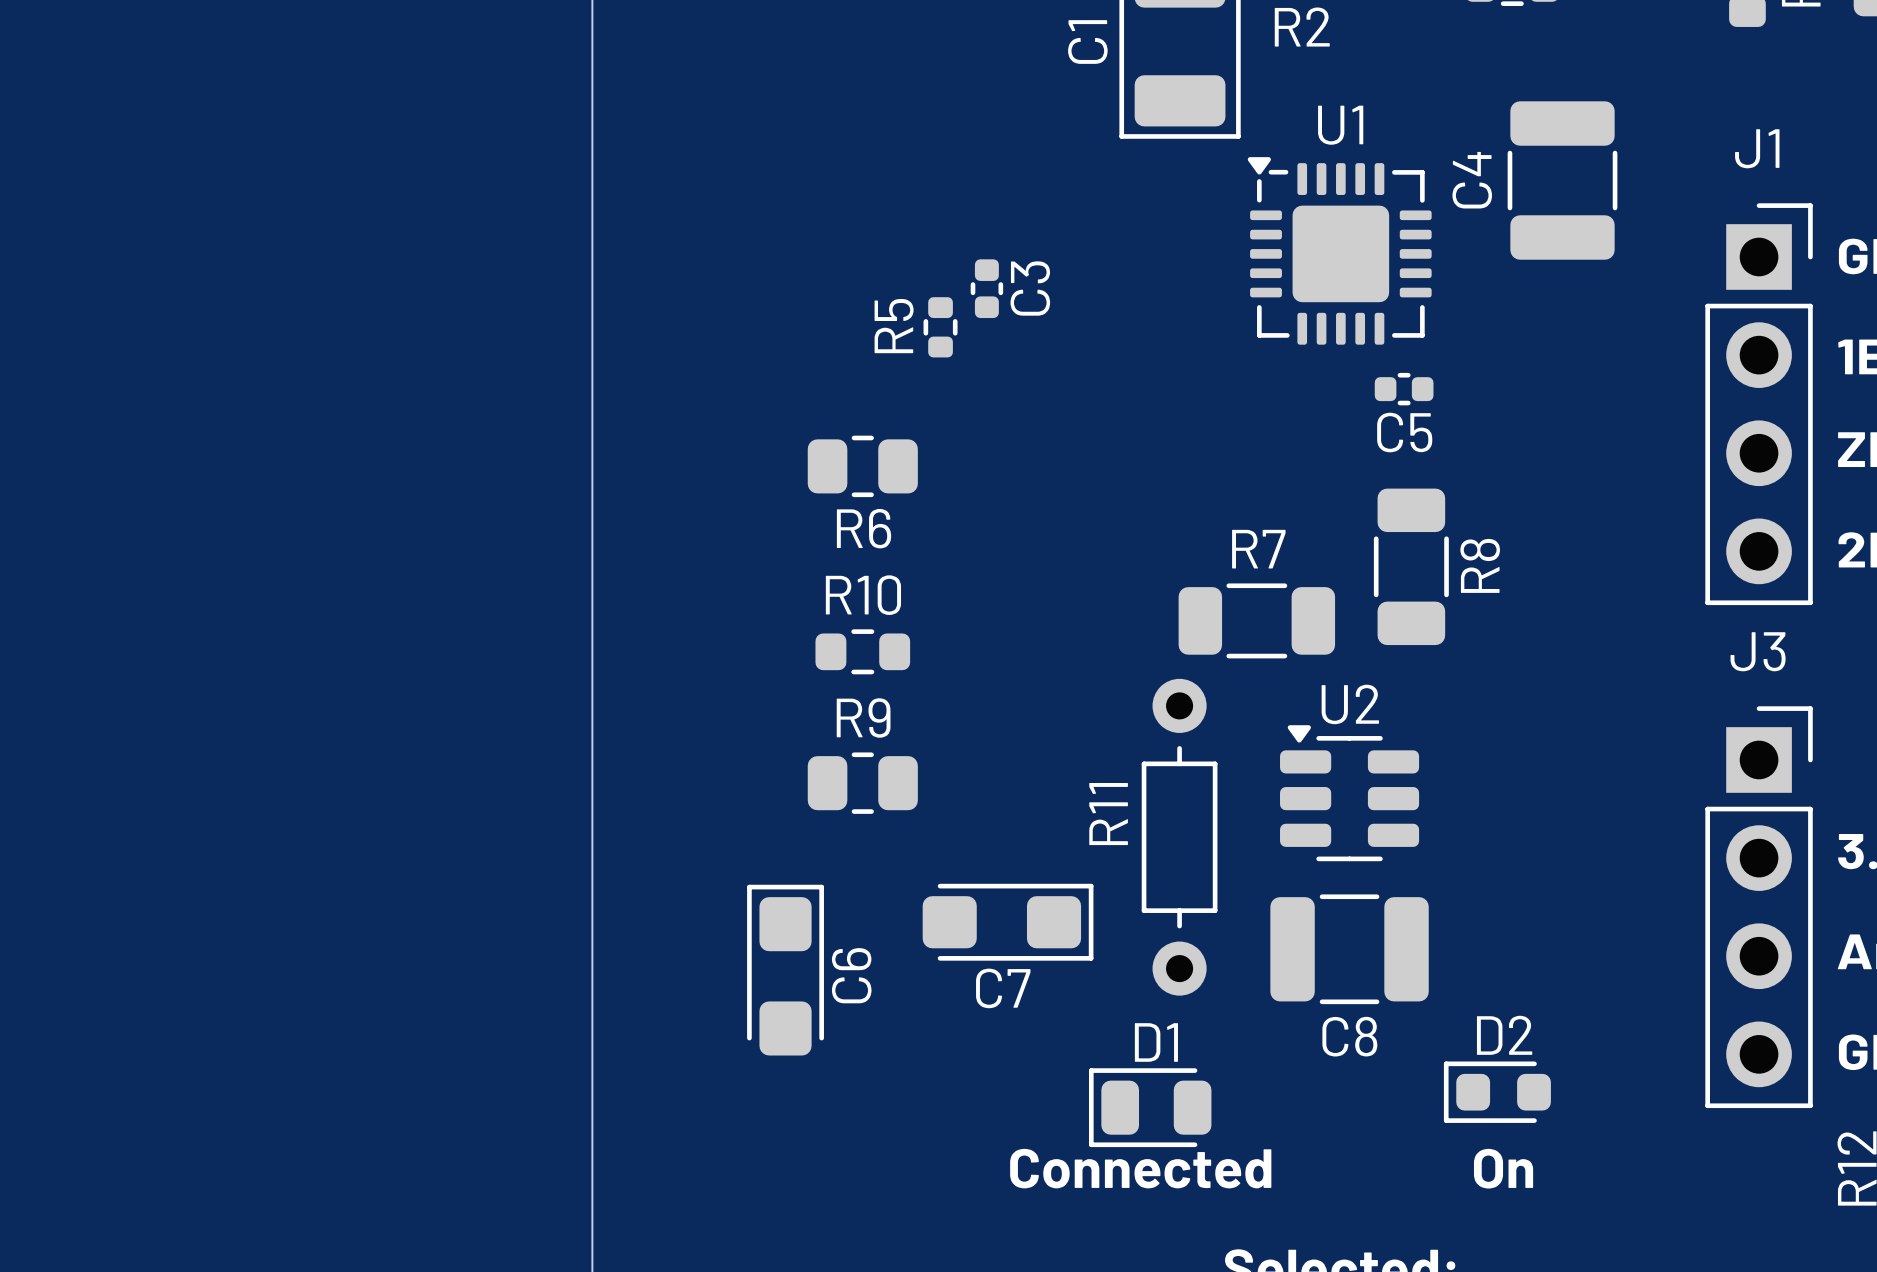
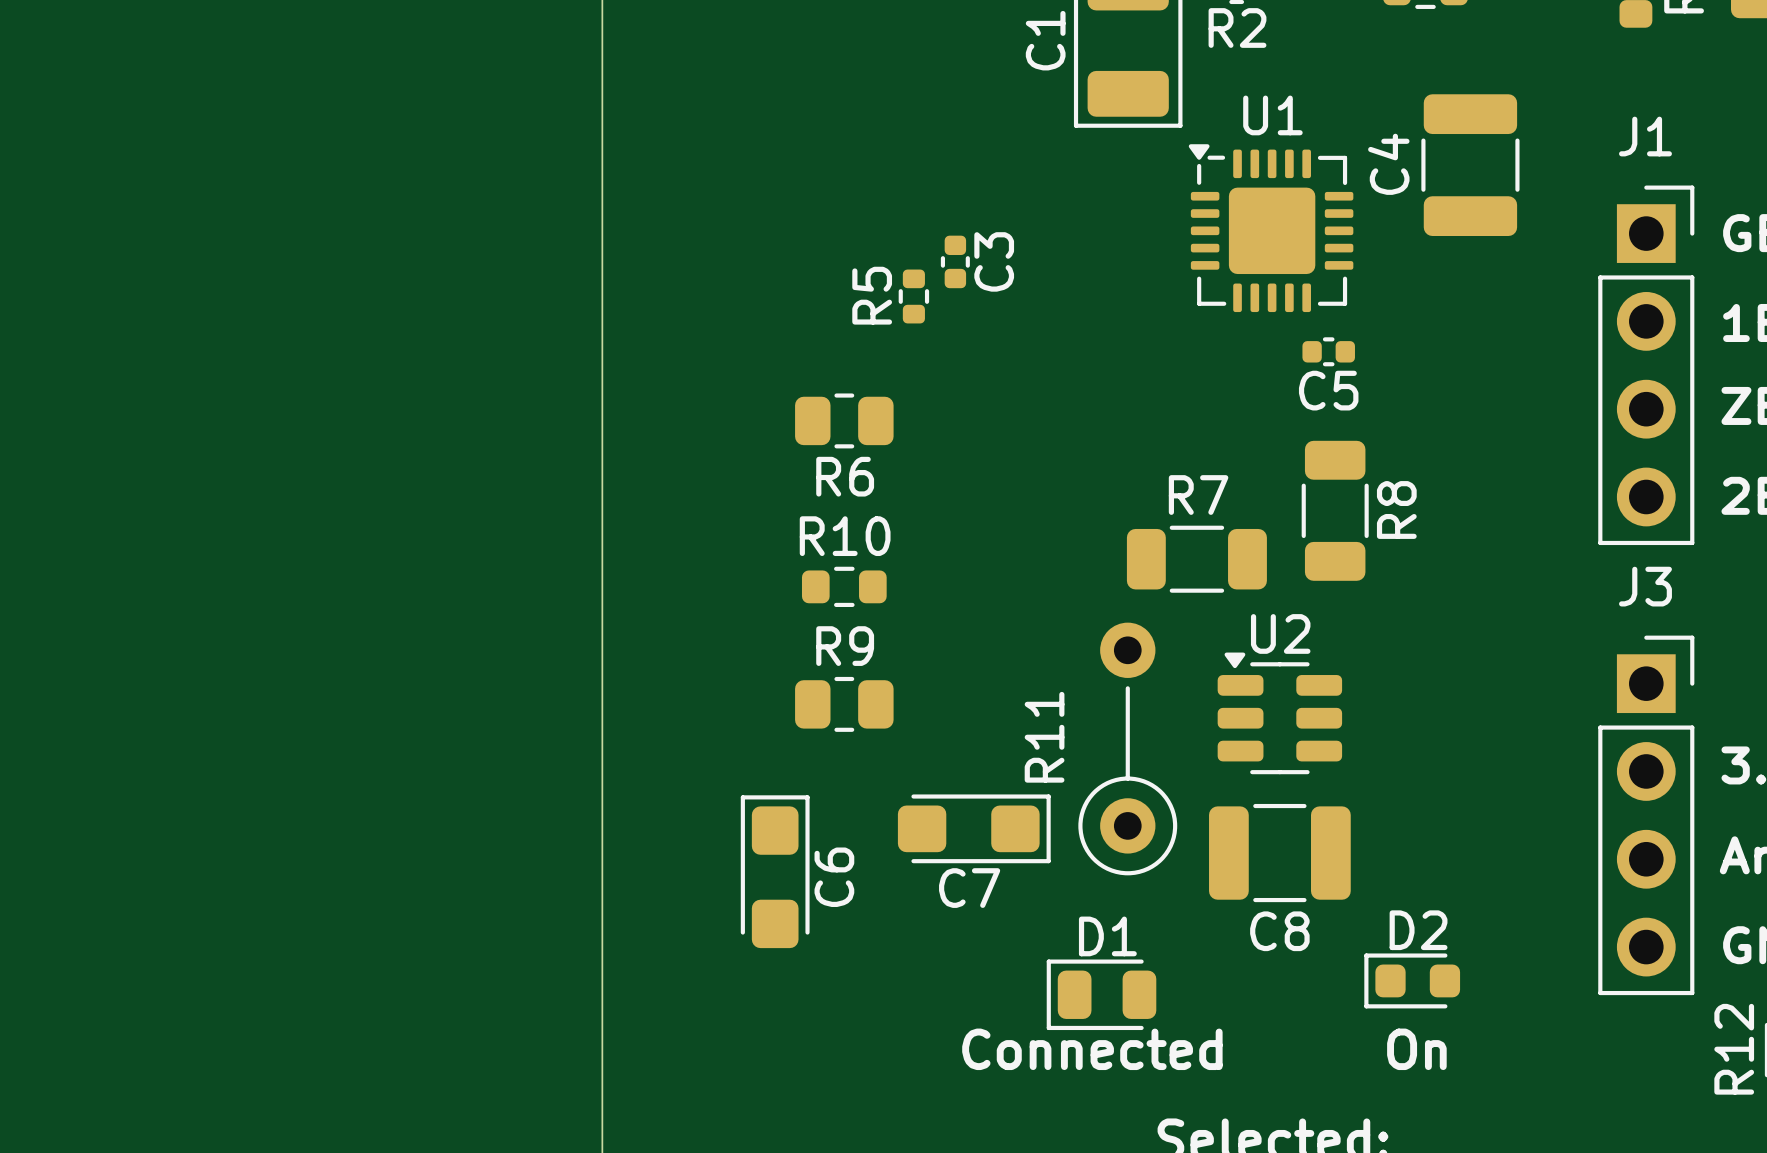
R11 footprint: [1141, 678, 1218, 996] -> [1078, 622, 1178, 876]

